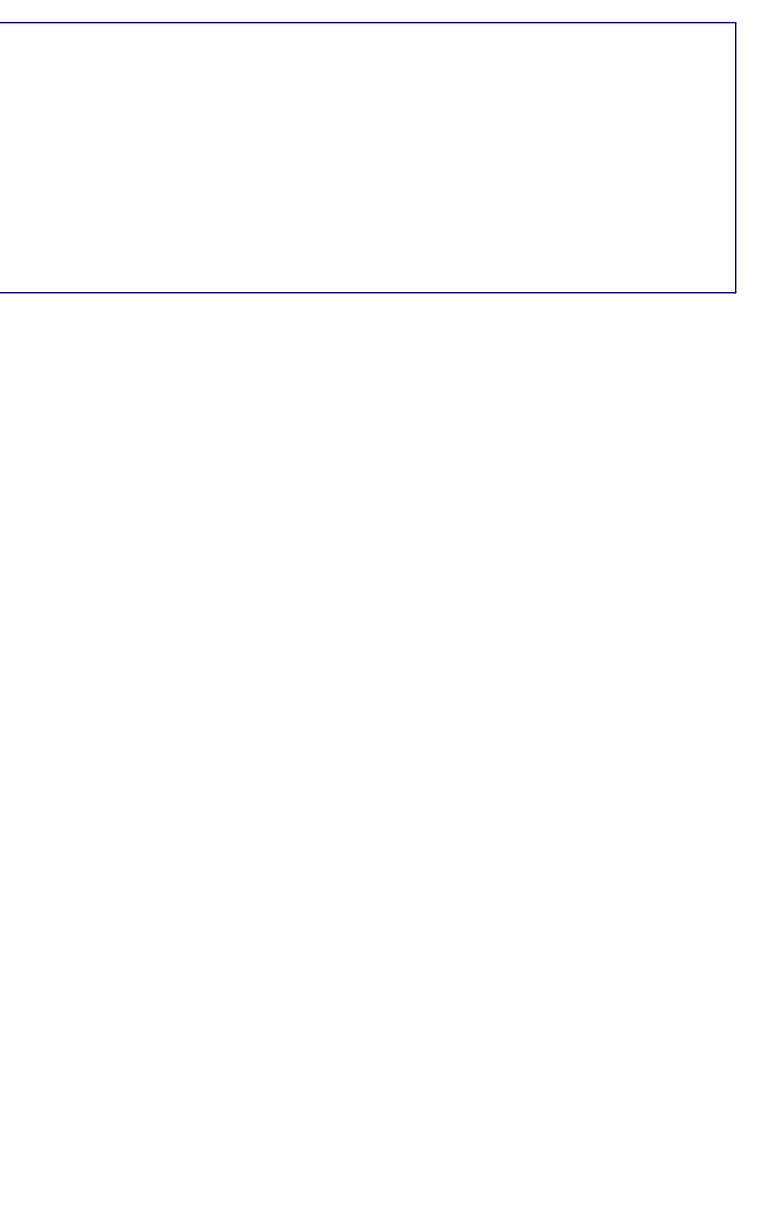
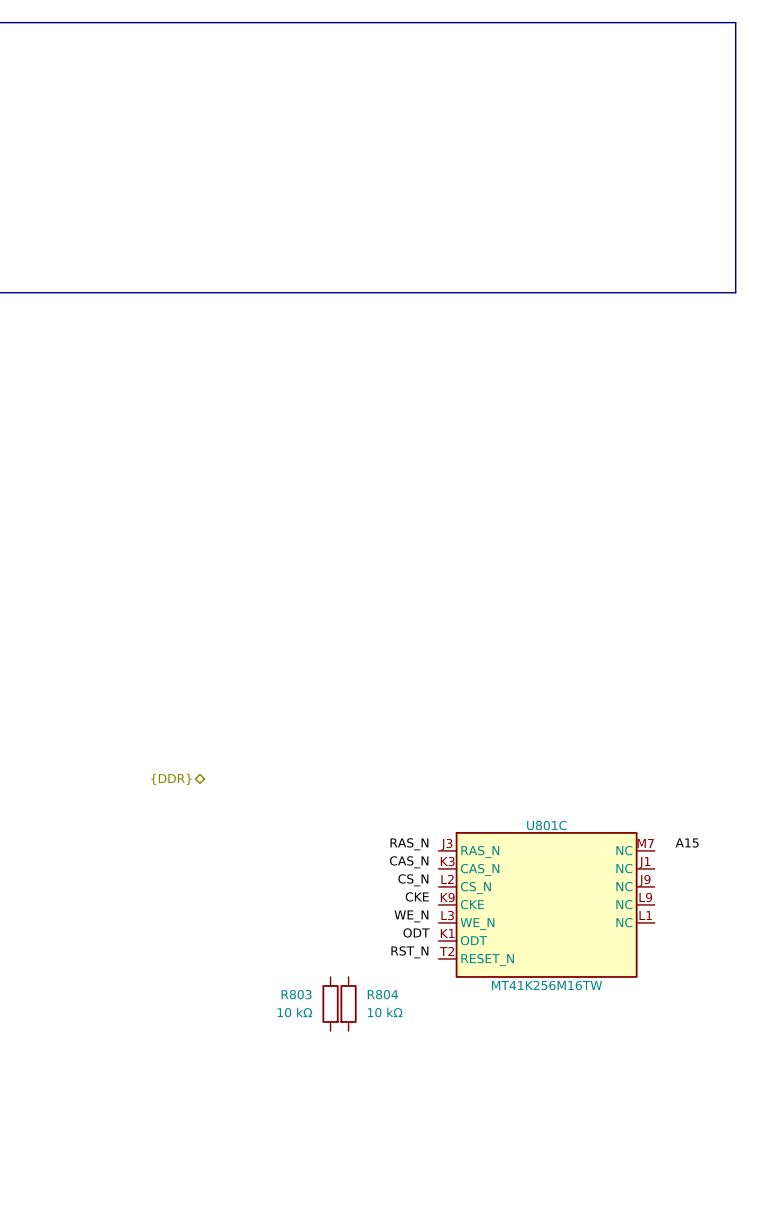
hierarchical label: none -> {DDR} (171, 779)
label: none -> A15 (687, 842)
label: none -> RAS_N (409, 844)
label: none -> CAS_N (409, 862)
label: none -> CS_N (413, 880)
label: none -> CKE (417, 896)
U801C: none -> MT41K256M16TW (546, 904)
label: none -> WE_N (411, 916)
label: none -> ODT (416, 932)
label: none -> RST_N (409, 952)
R803: none -> 10 kΩ (330, 1003)
R804: none -> 10 kΩ (348, 1003)

